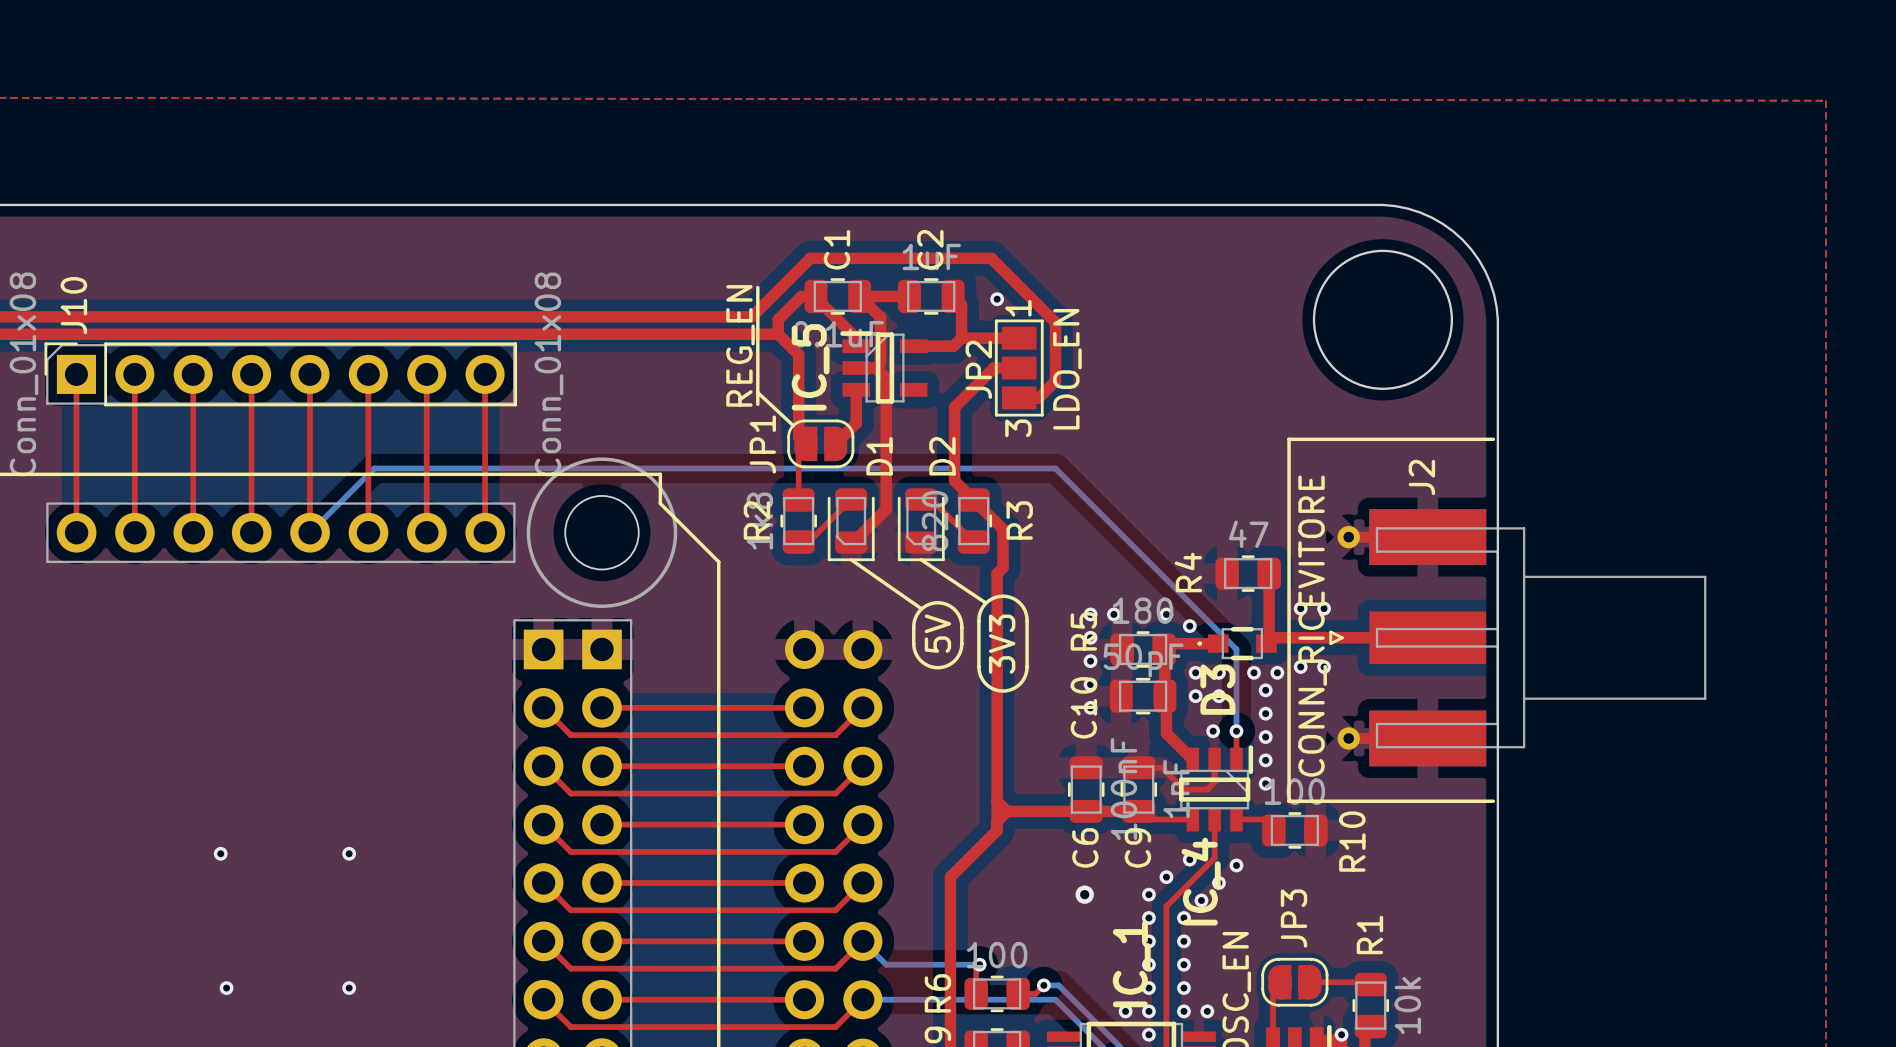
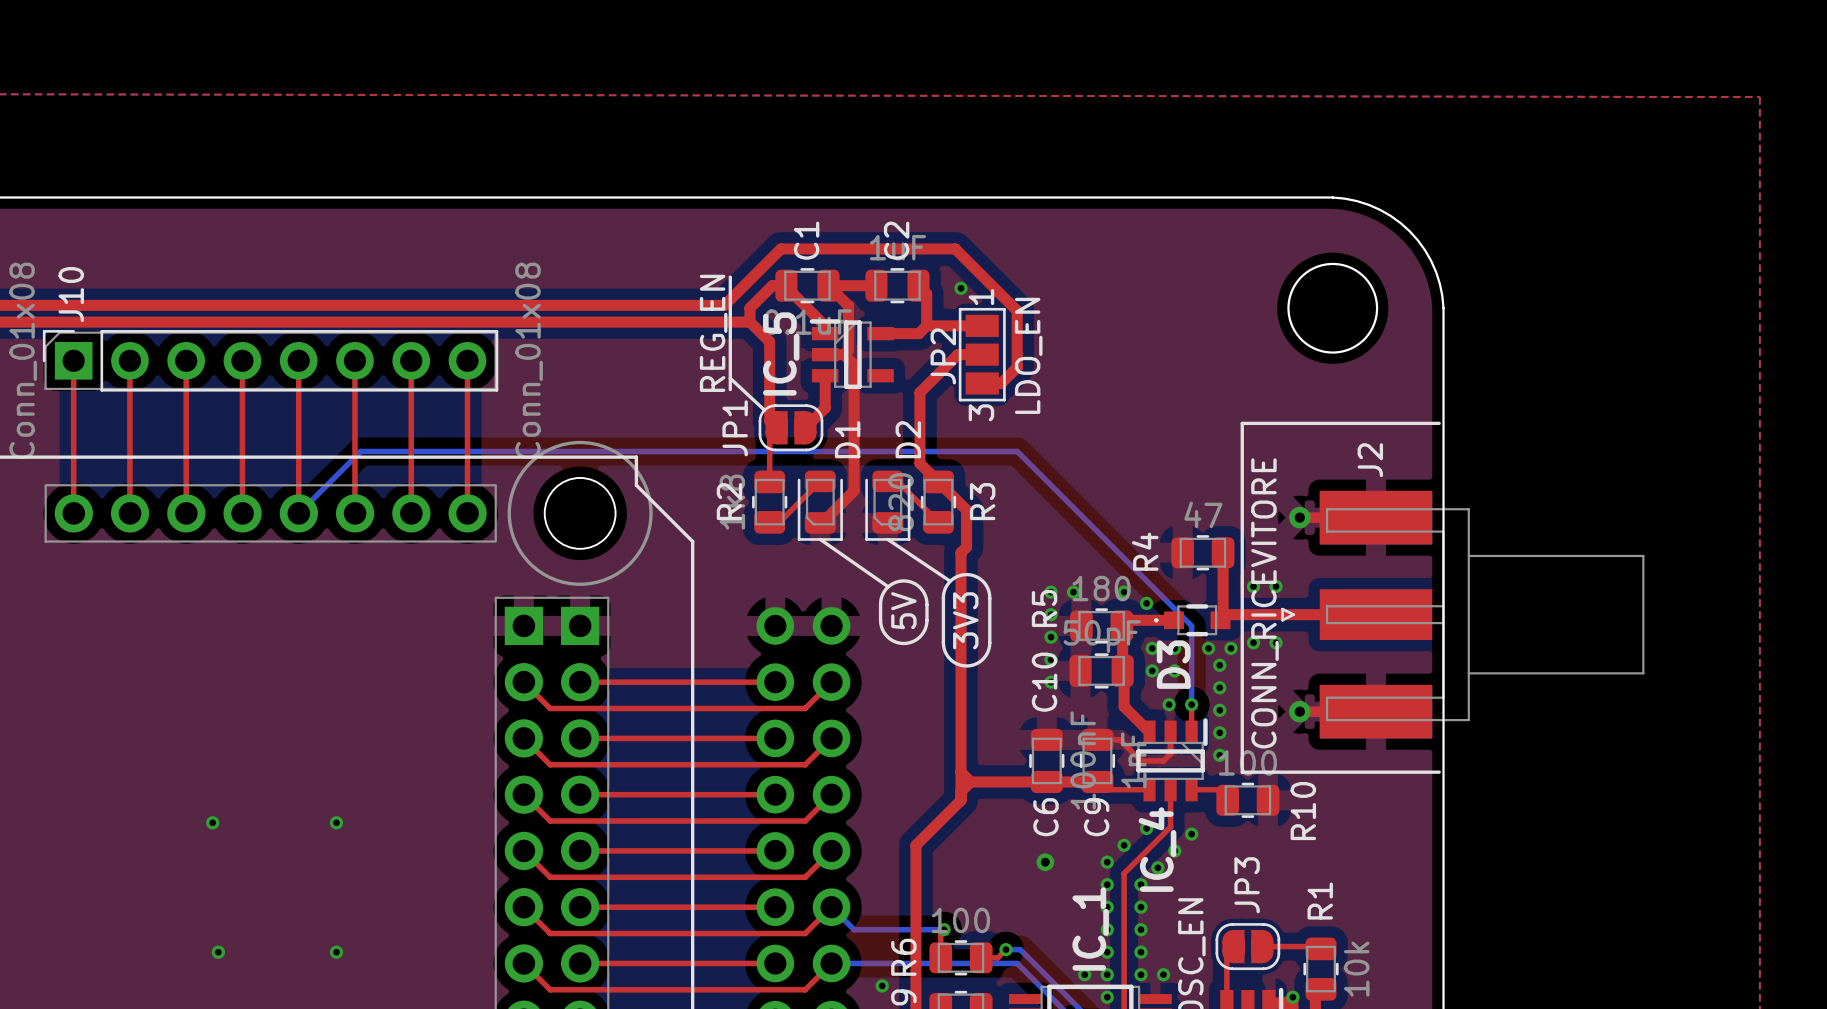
round board edge size: [1312, 249, 1454, 390] -> [1287, 262, 1379, 354]
via: none -> (882, 985)

